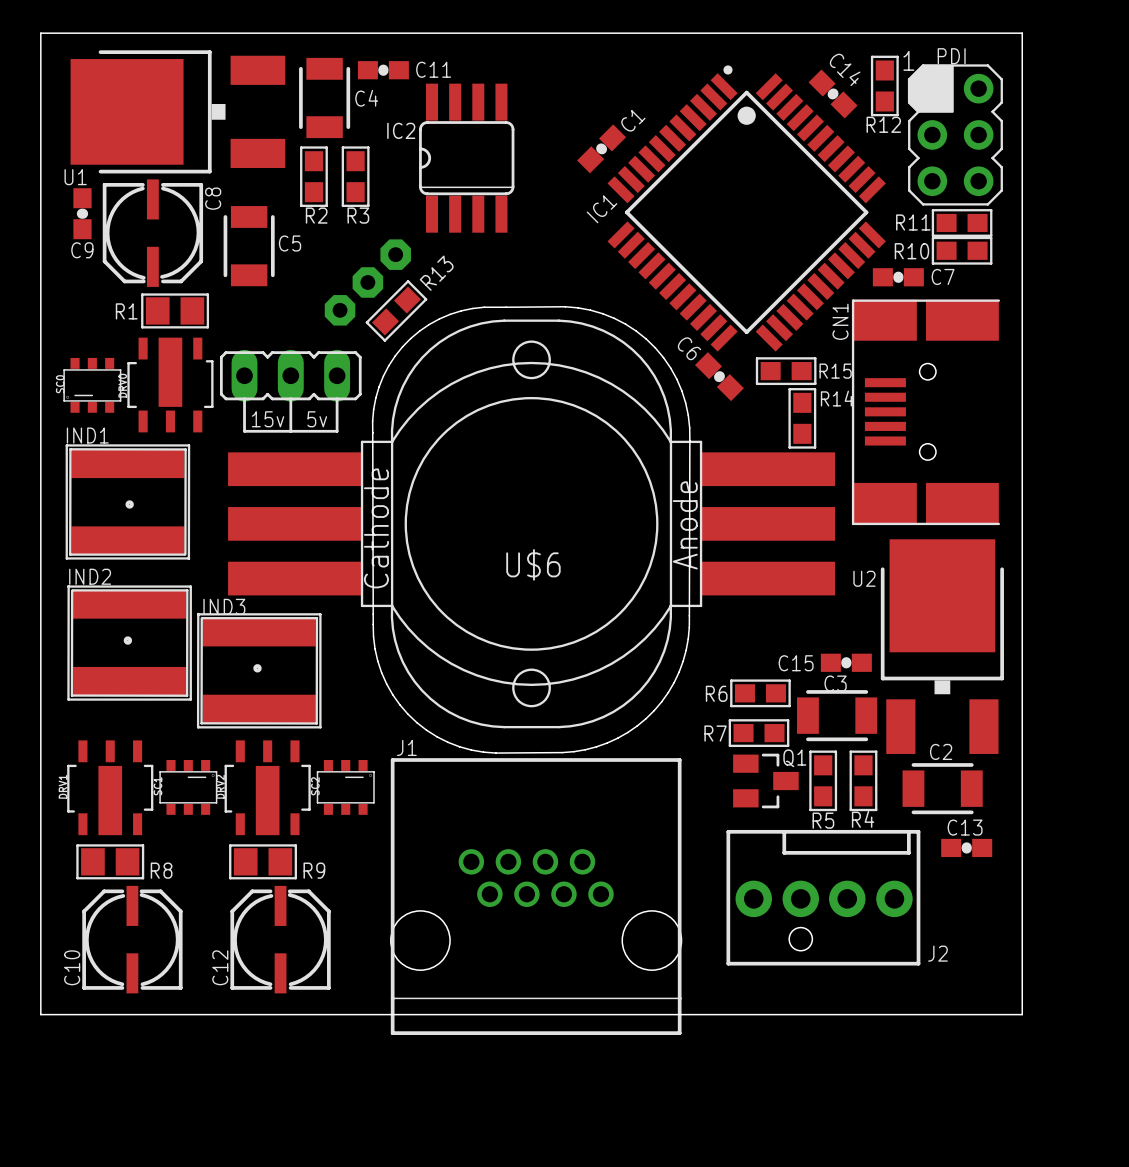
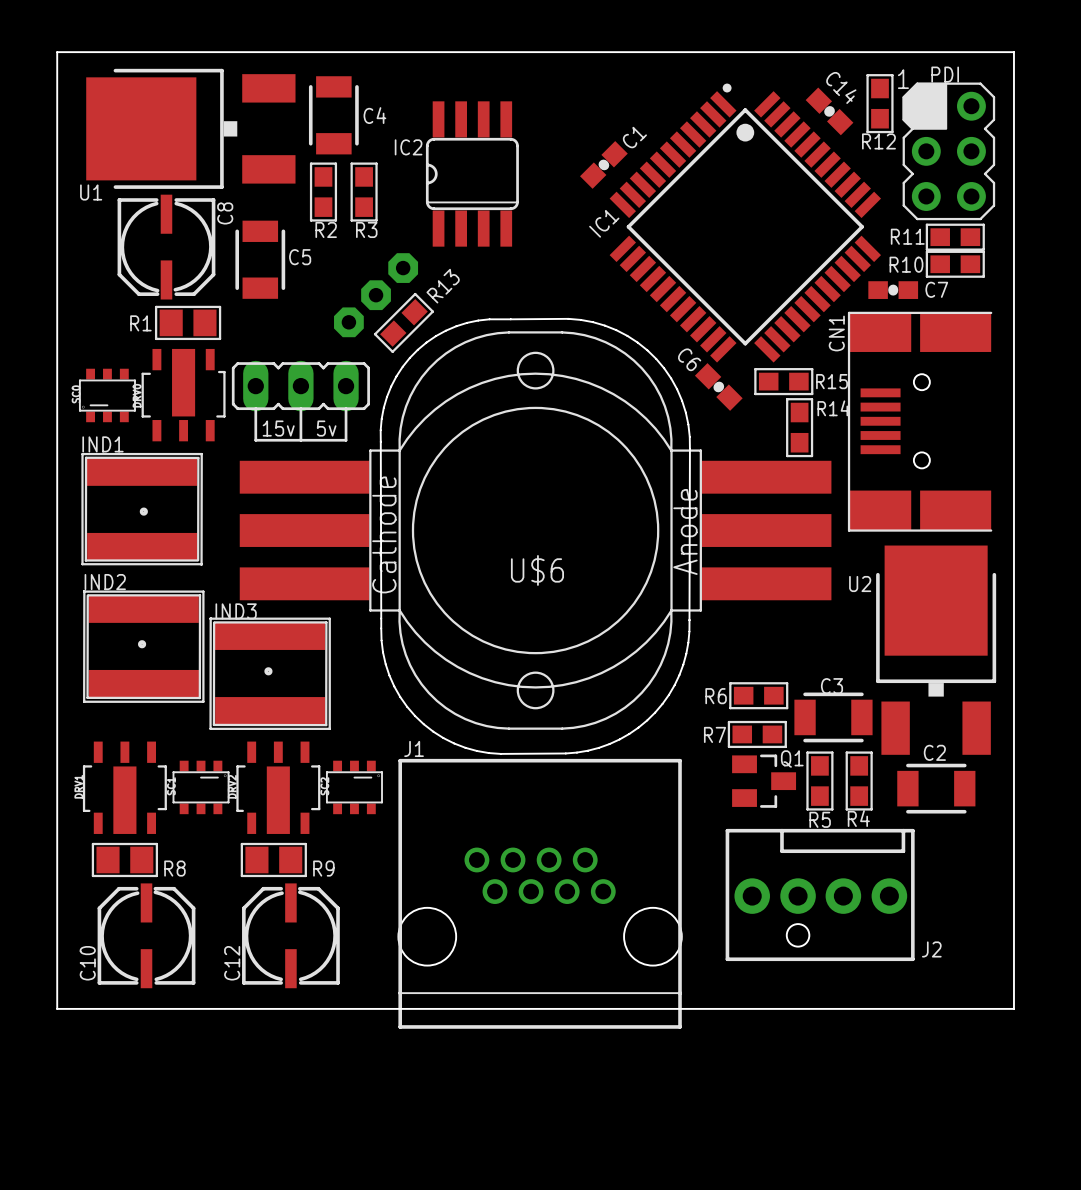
C11: (383, 70) -> none
C9: (82, 213) -> none
C15: (846, 662) -> none
C13: (966, 847) -> none

